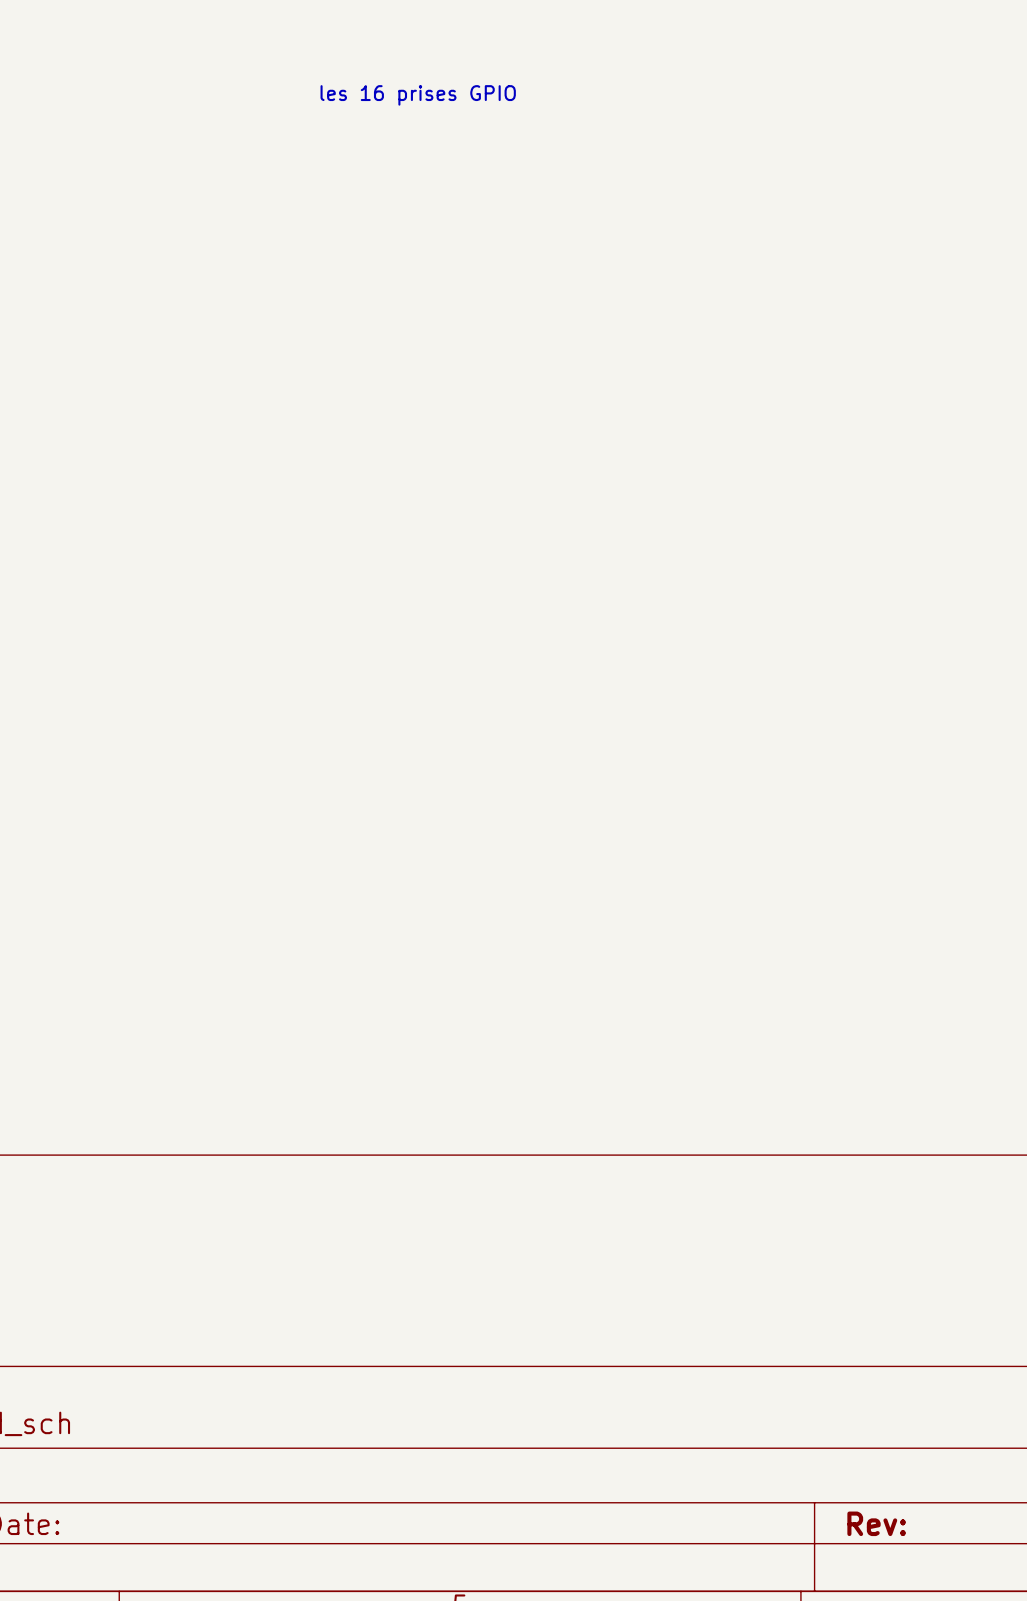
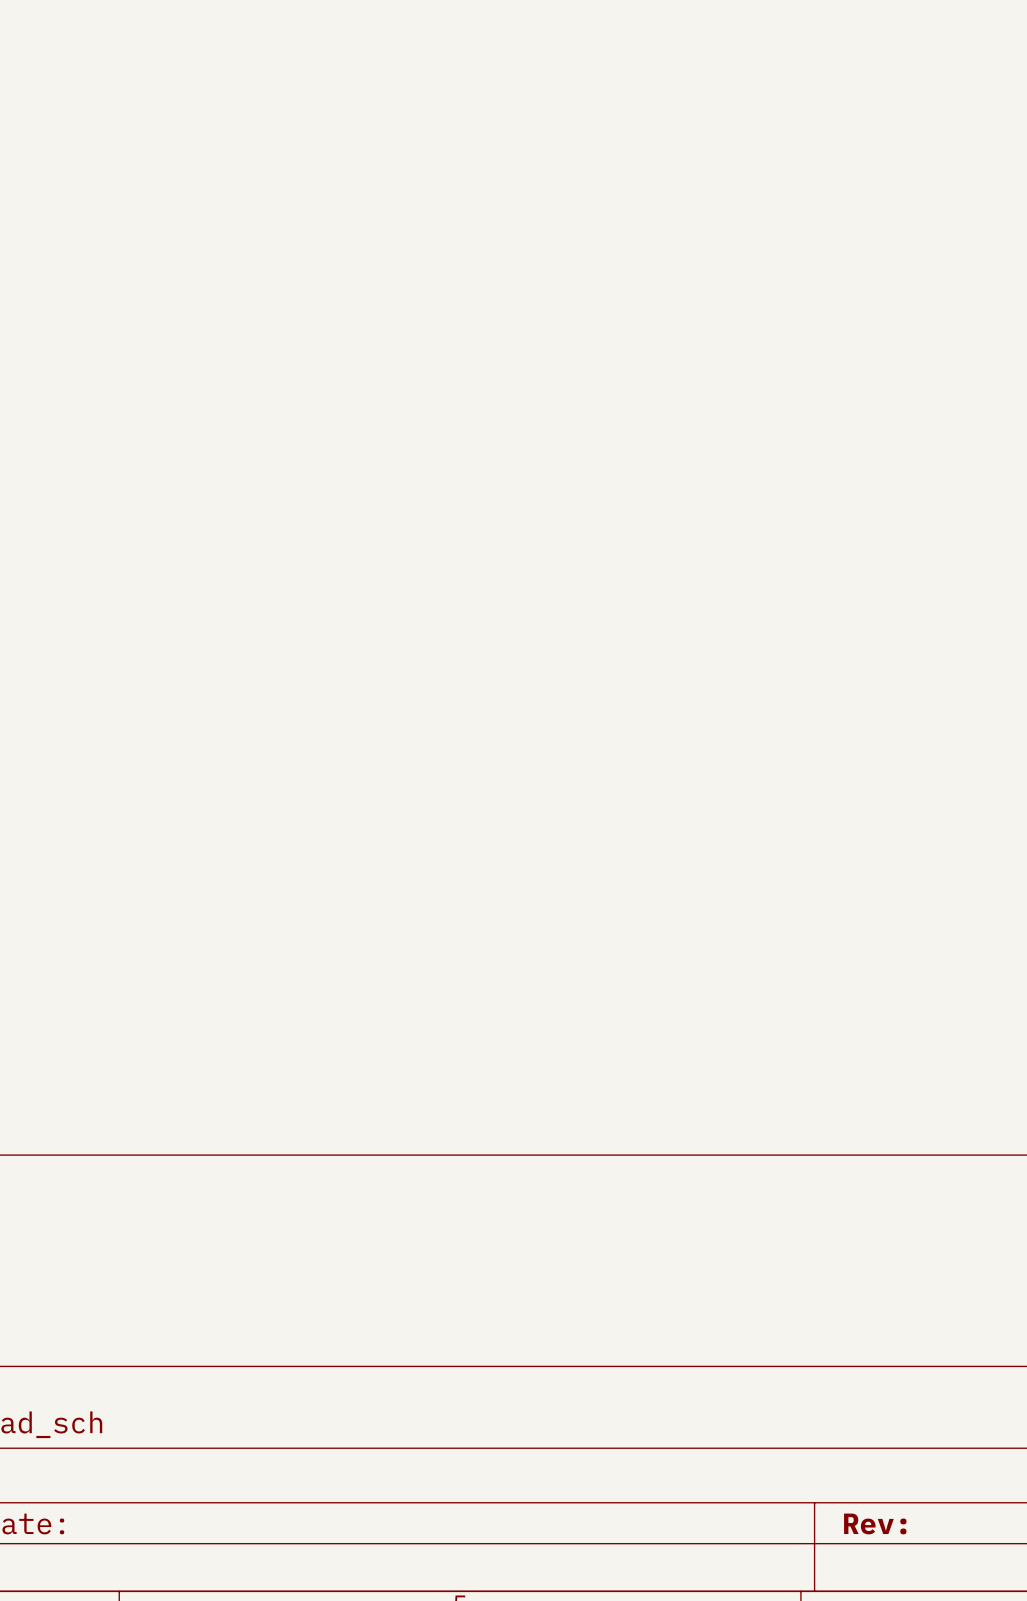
text: les 16 prises GPIO (418, 95) -> none

